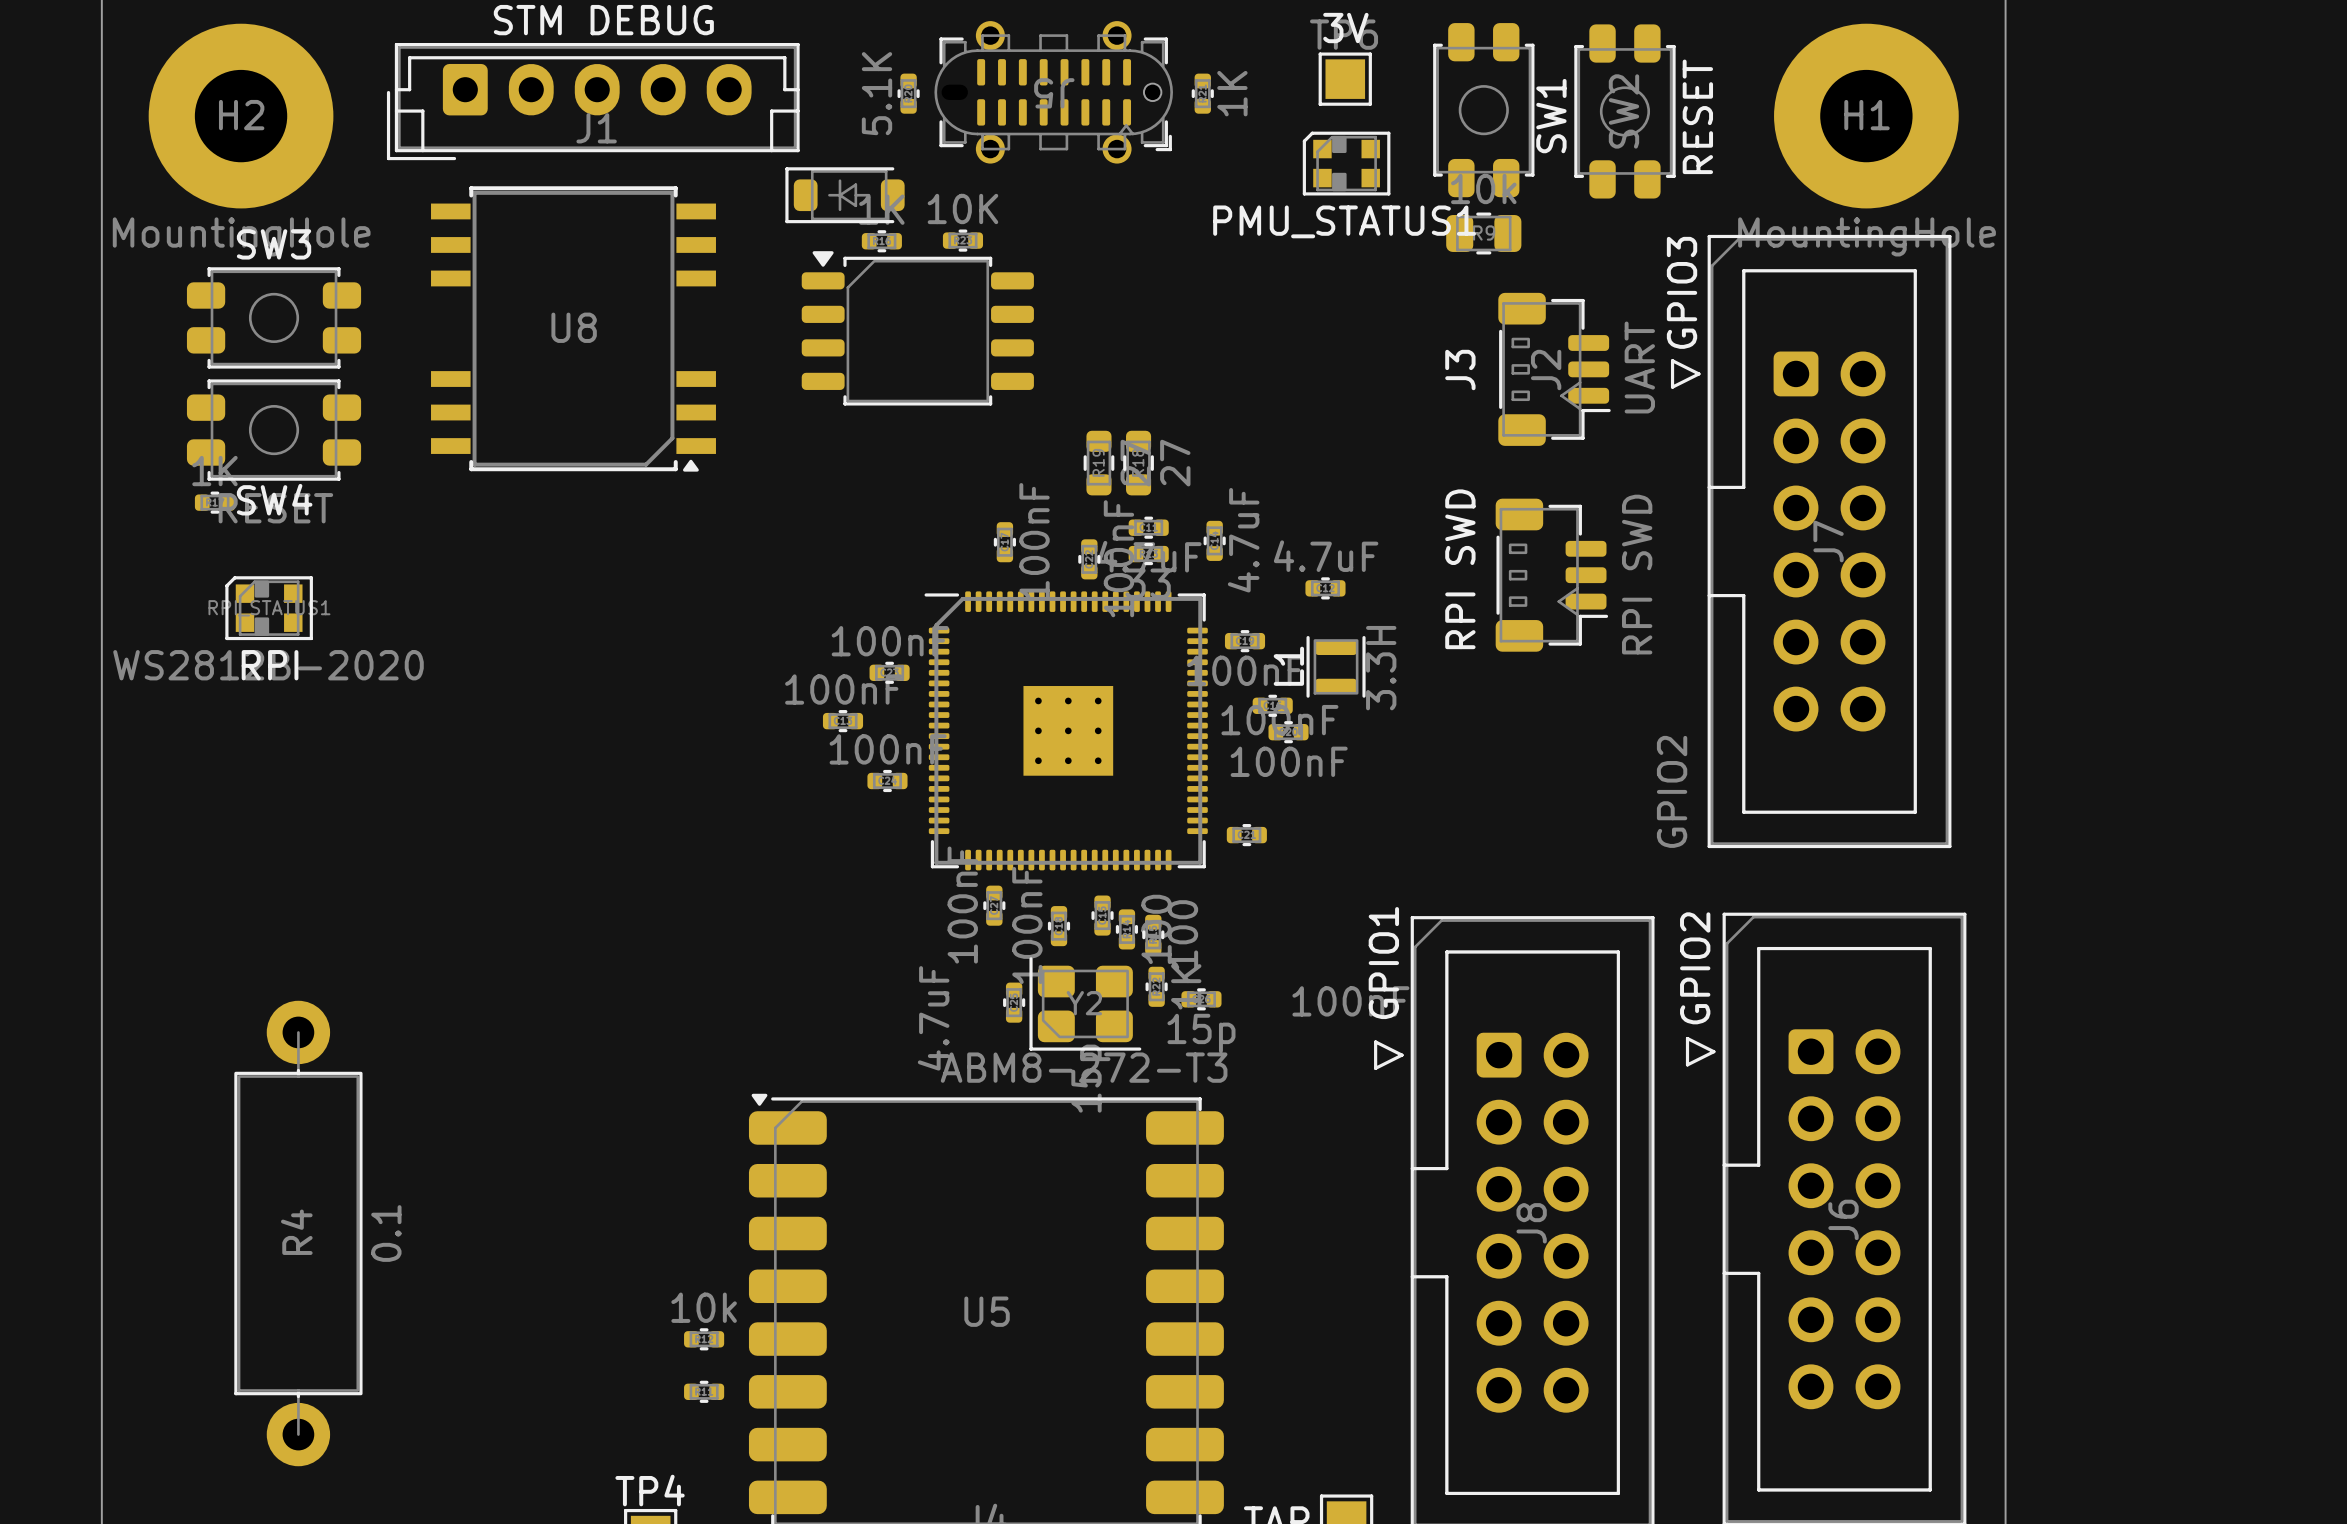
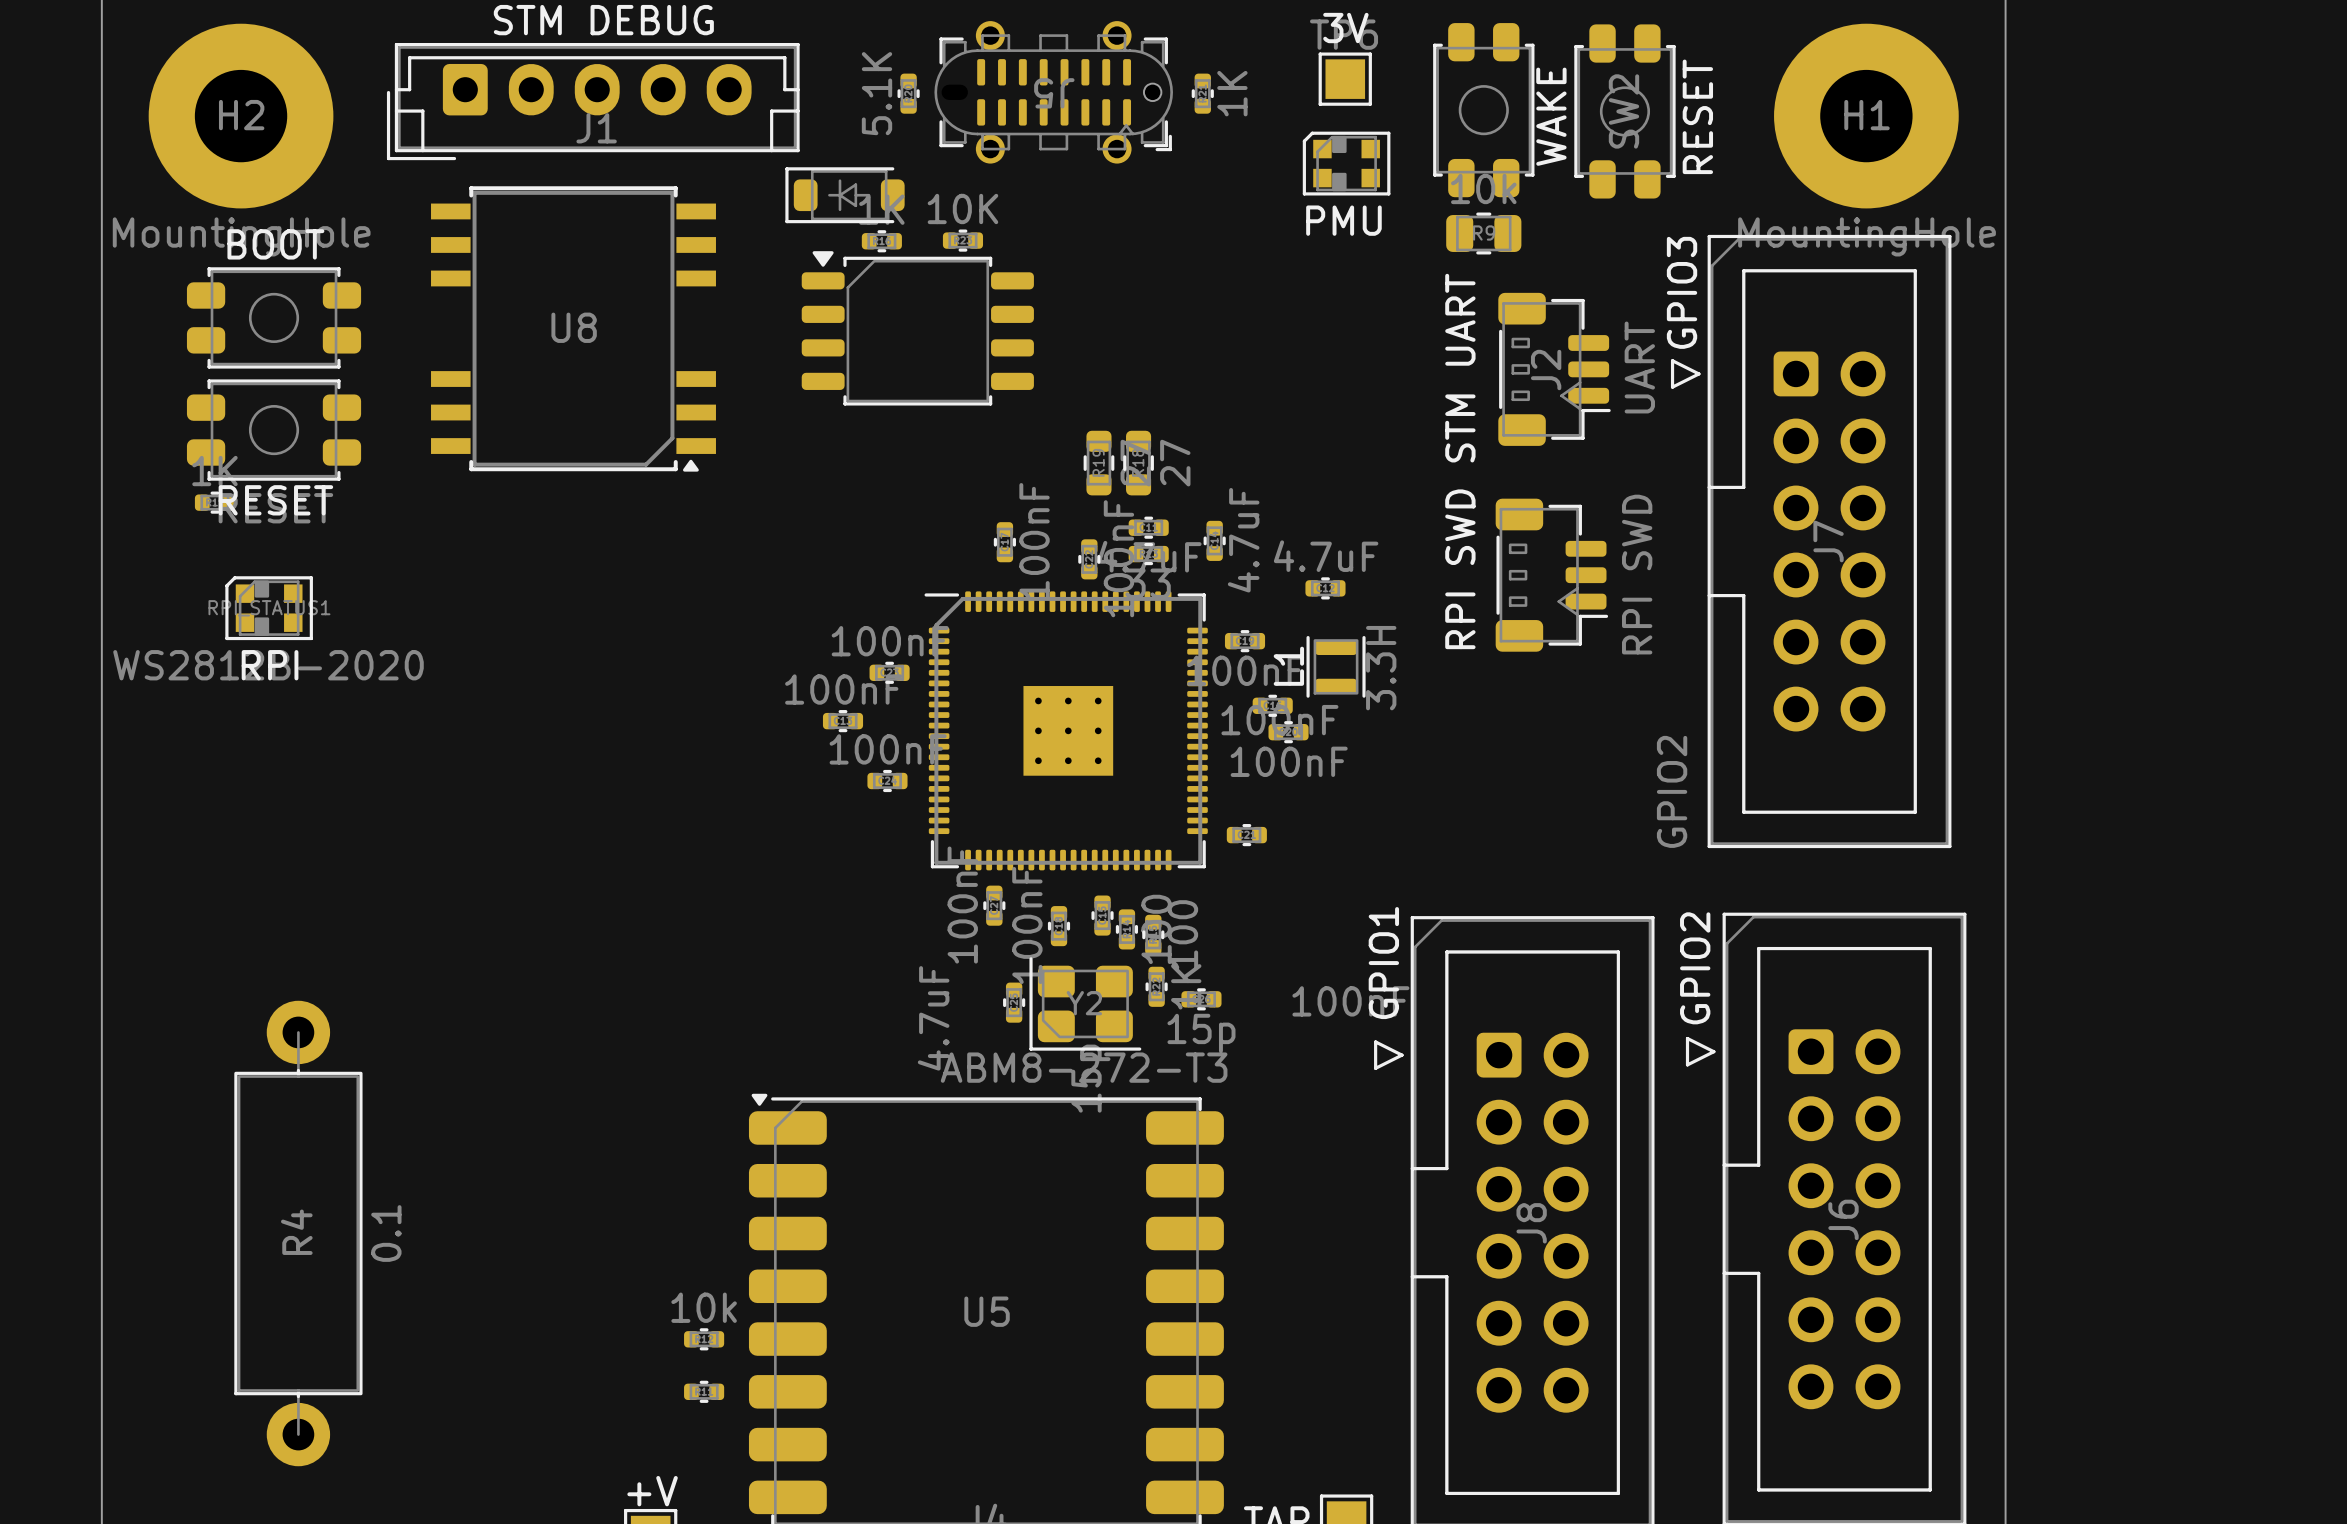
SW1 name: SW1 (1551, 116) -> WAKE (1551, 116)
PMU_STATUS1 name: PMU_STATUS1 (1344, 221) -> PMU (1343, 220)
SW3 name: SW3 (274, 244) -> BOOT (275, 244)
J3 name: J3 (1460, 370) -> STM UART (1460, 368)
SW4 name: SW4 (274, 499) -> RESET (275, 500)
TP4 name: TP4 (650, 1490) -> +V (652, 1491)

